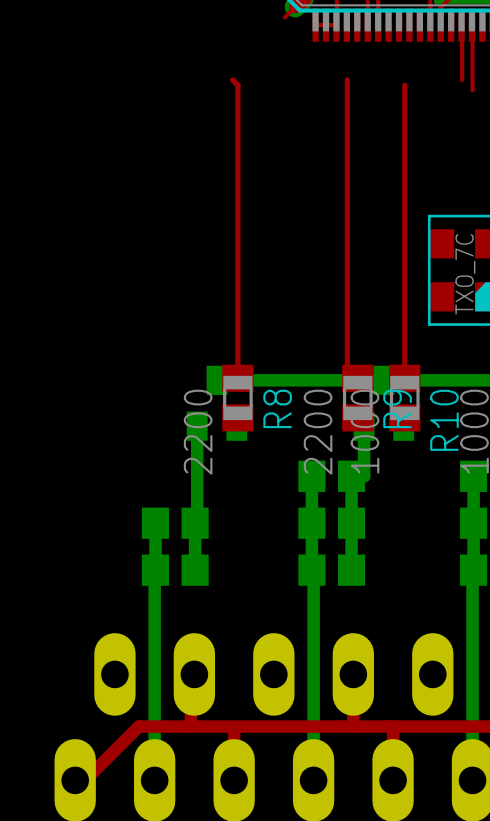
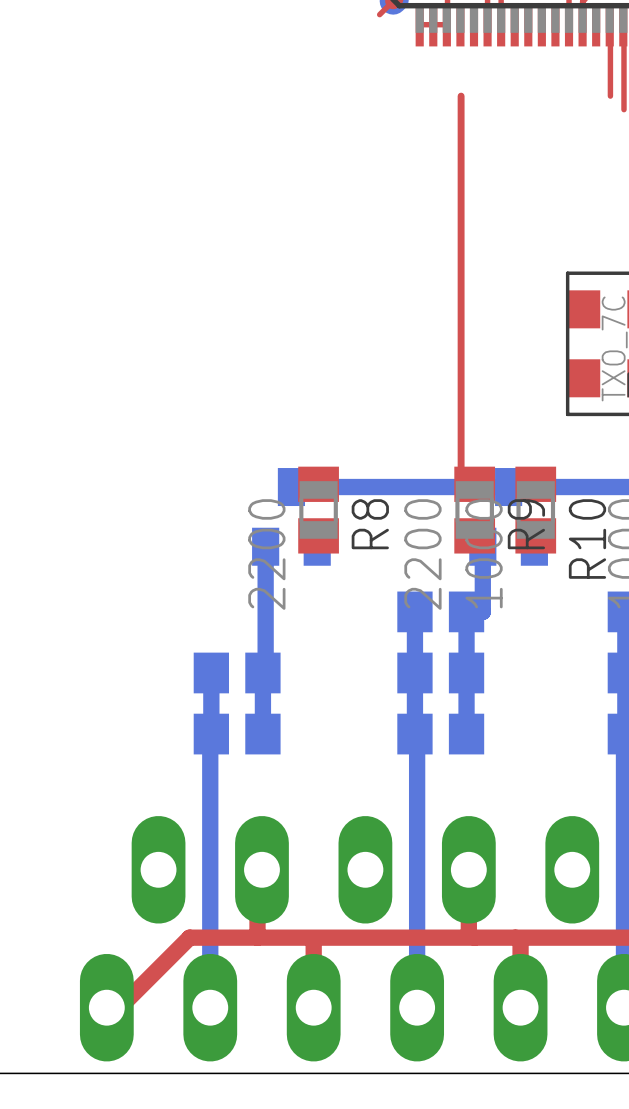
top track: (232, 79) (237, 85) (237, 378) -> none
top track: (404, 85) (404, 378) -> none

